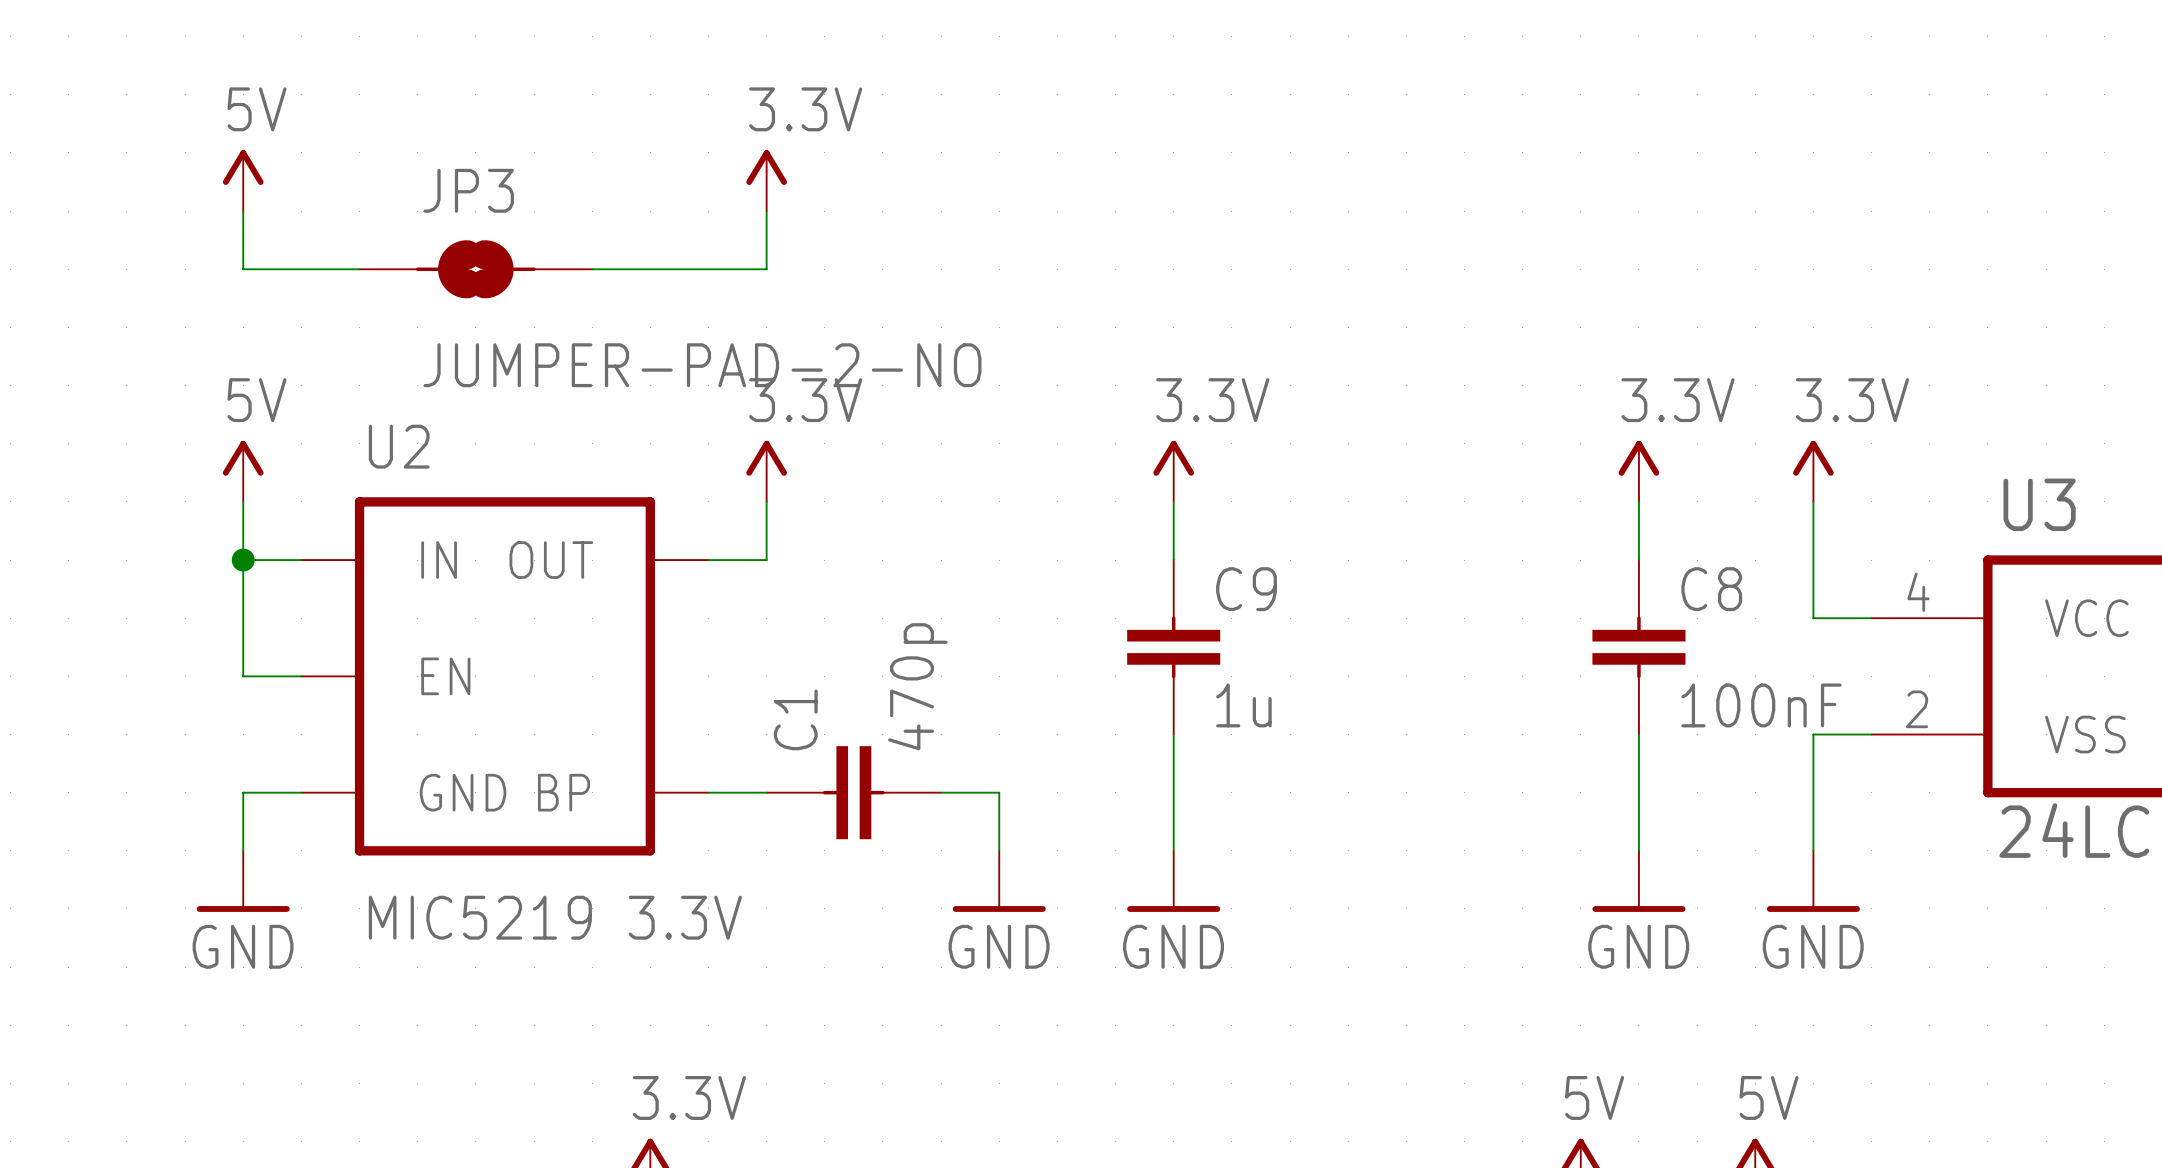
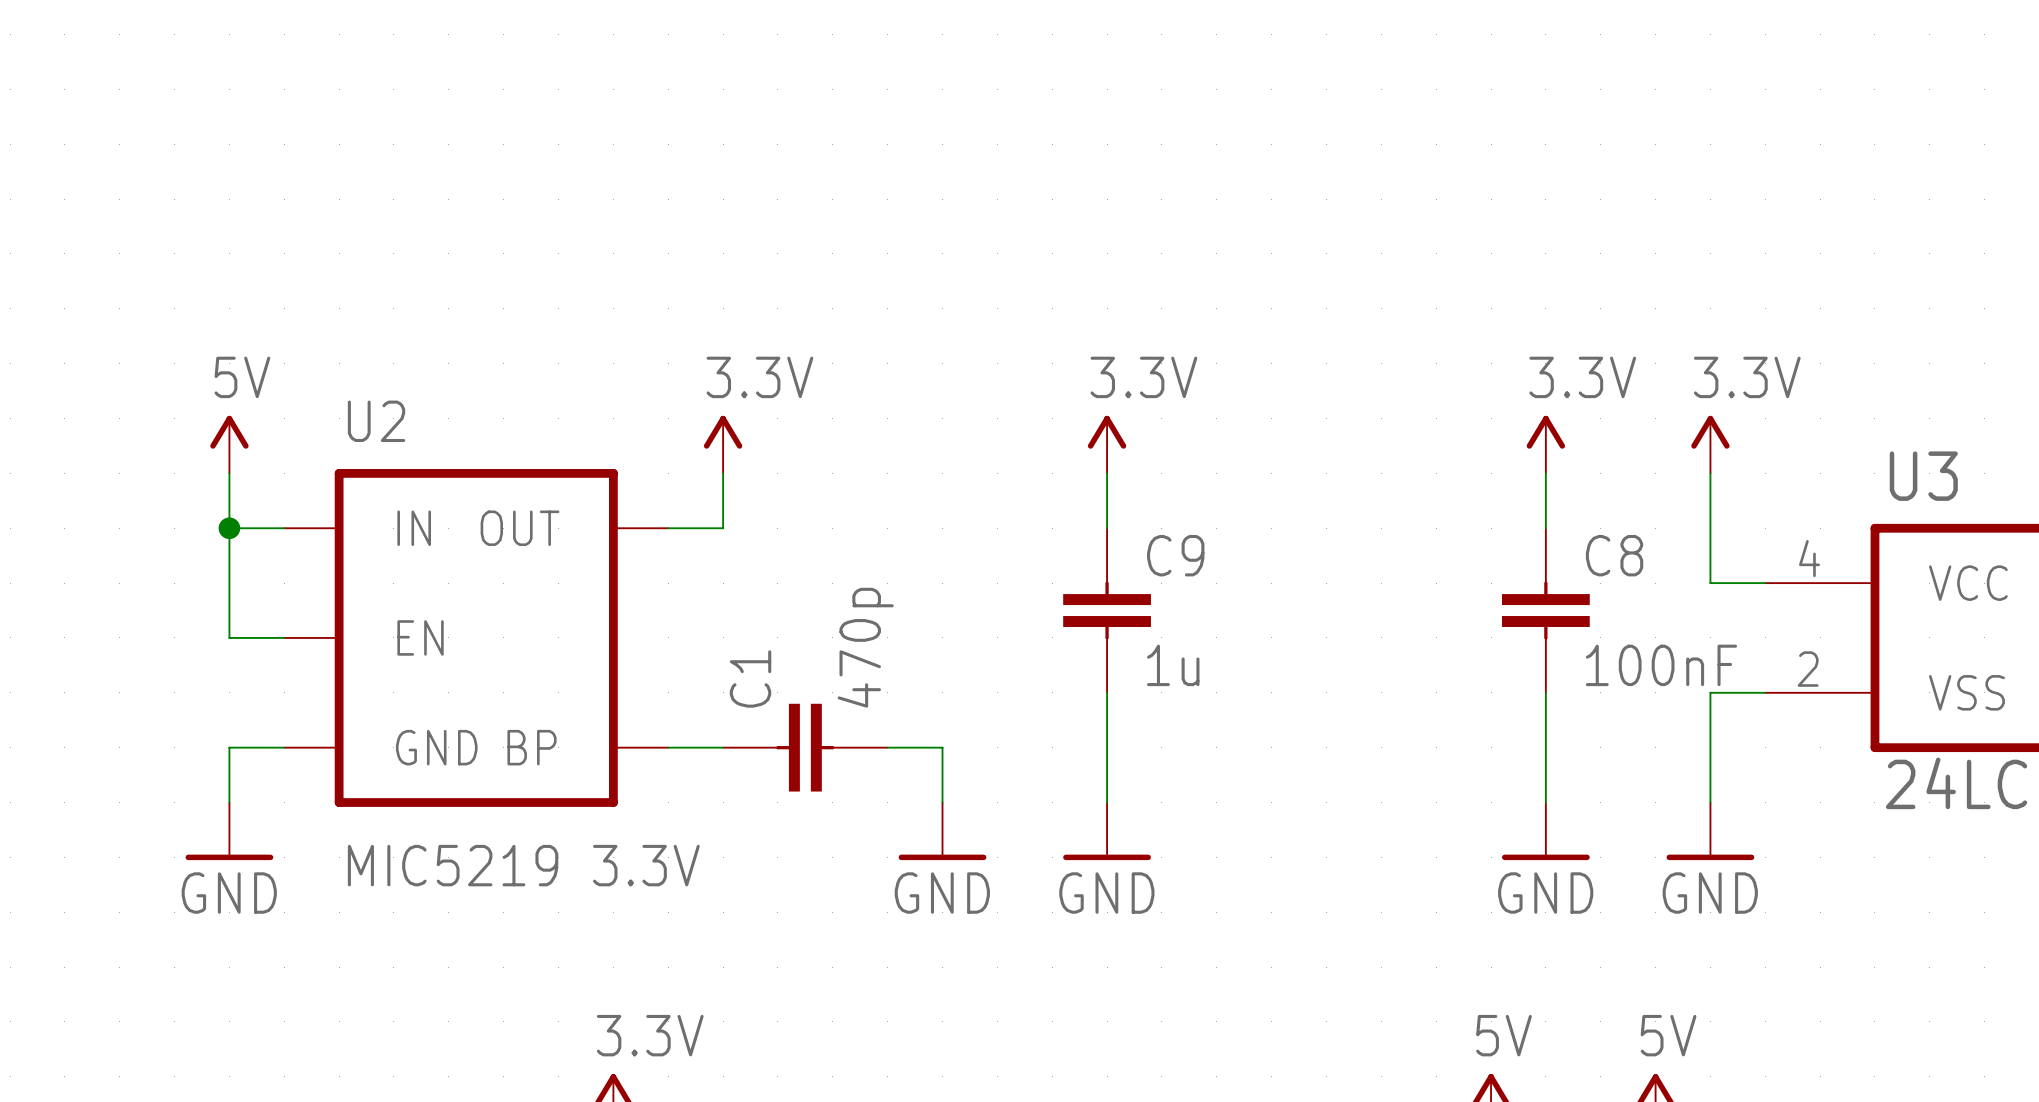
power symbol: 5V (243, 180) -> none
power symbol: 3.3V (766, 180) -> none
wire: (243, 211) (243, 269) (359, 269) -> none
wire: (766, 211) (766, 269) (592, 269) -> none
JP3: JUMPER-PAD-2-NO (475, 269) -> none

